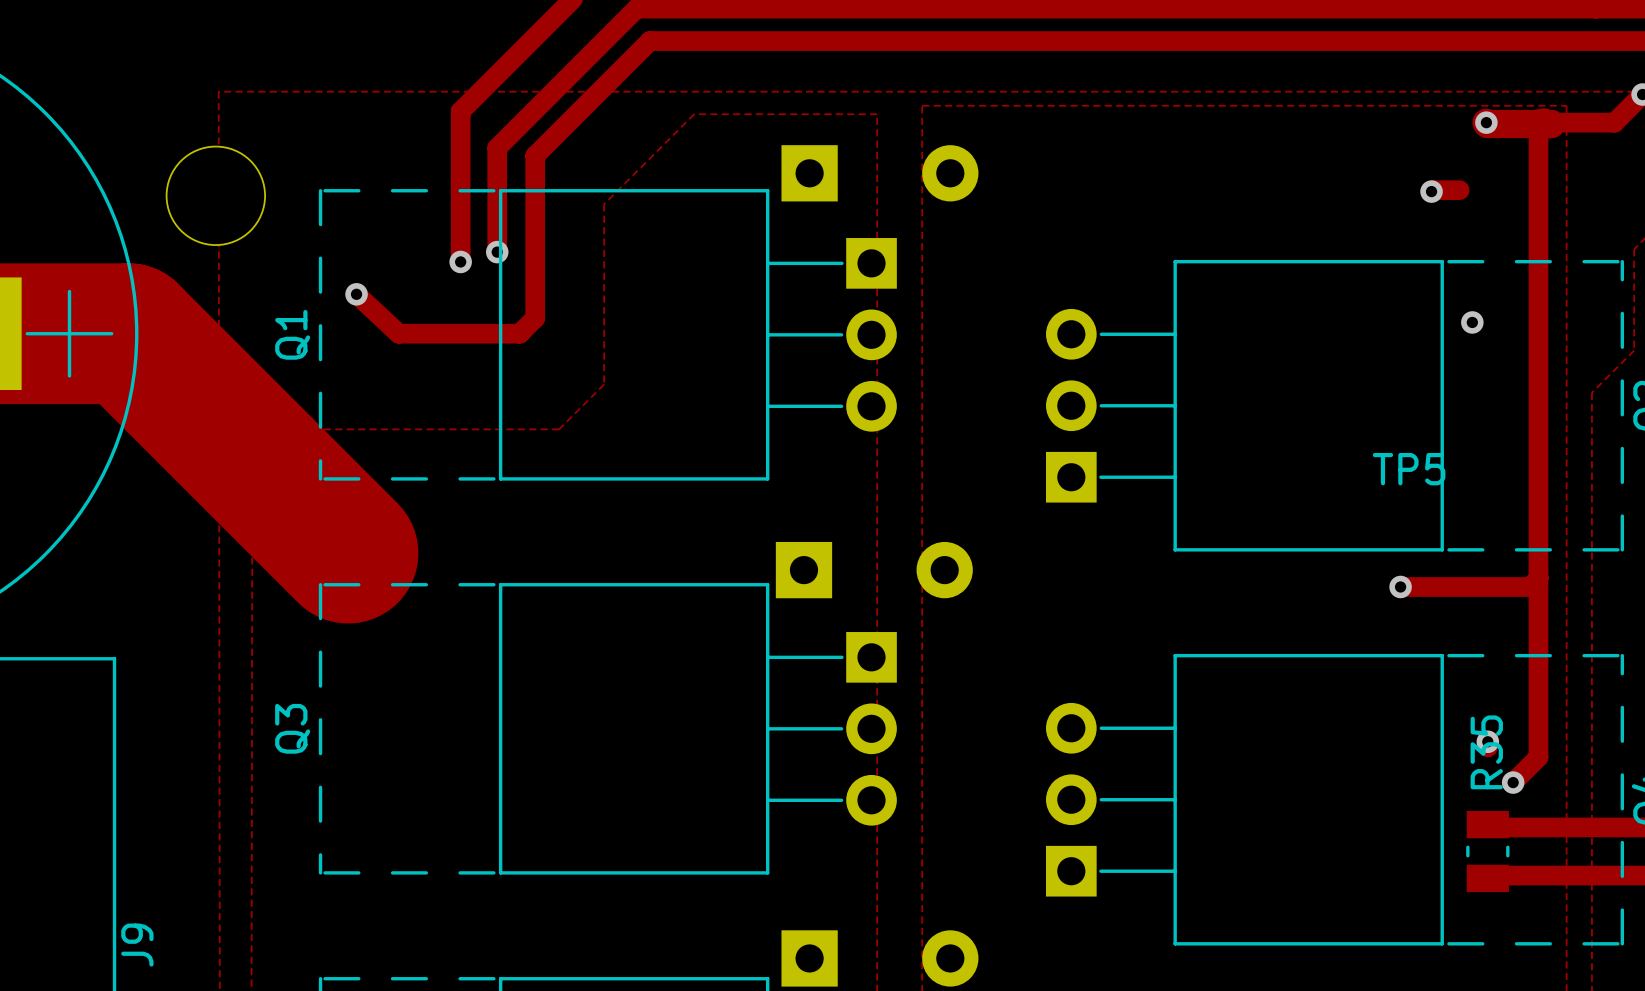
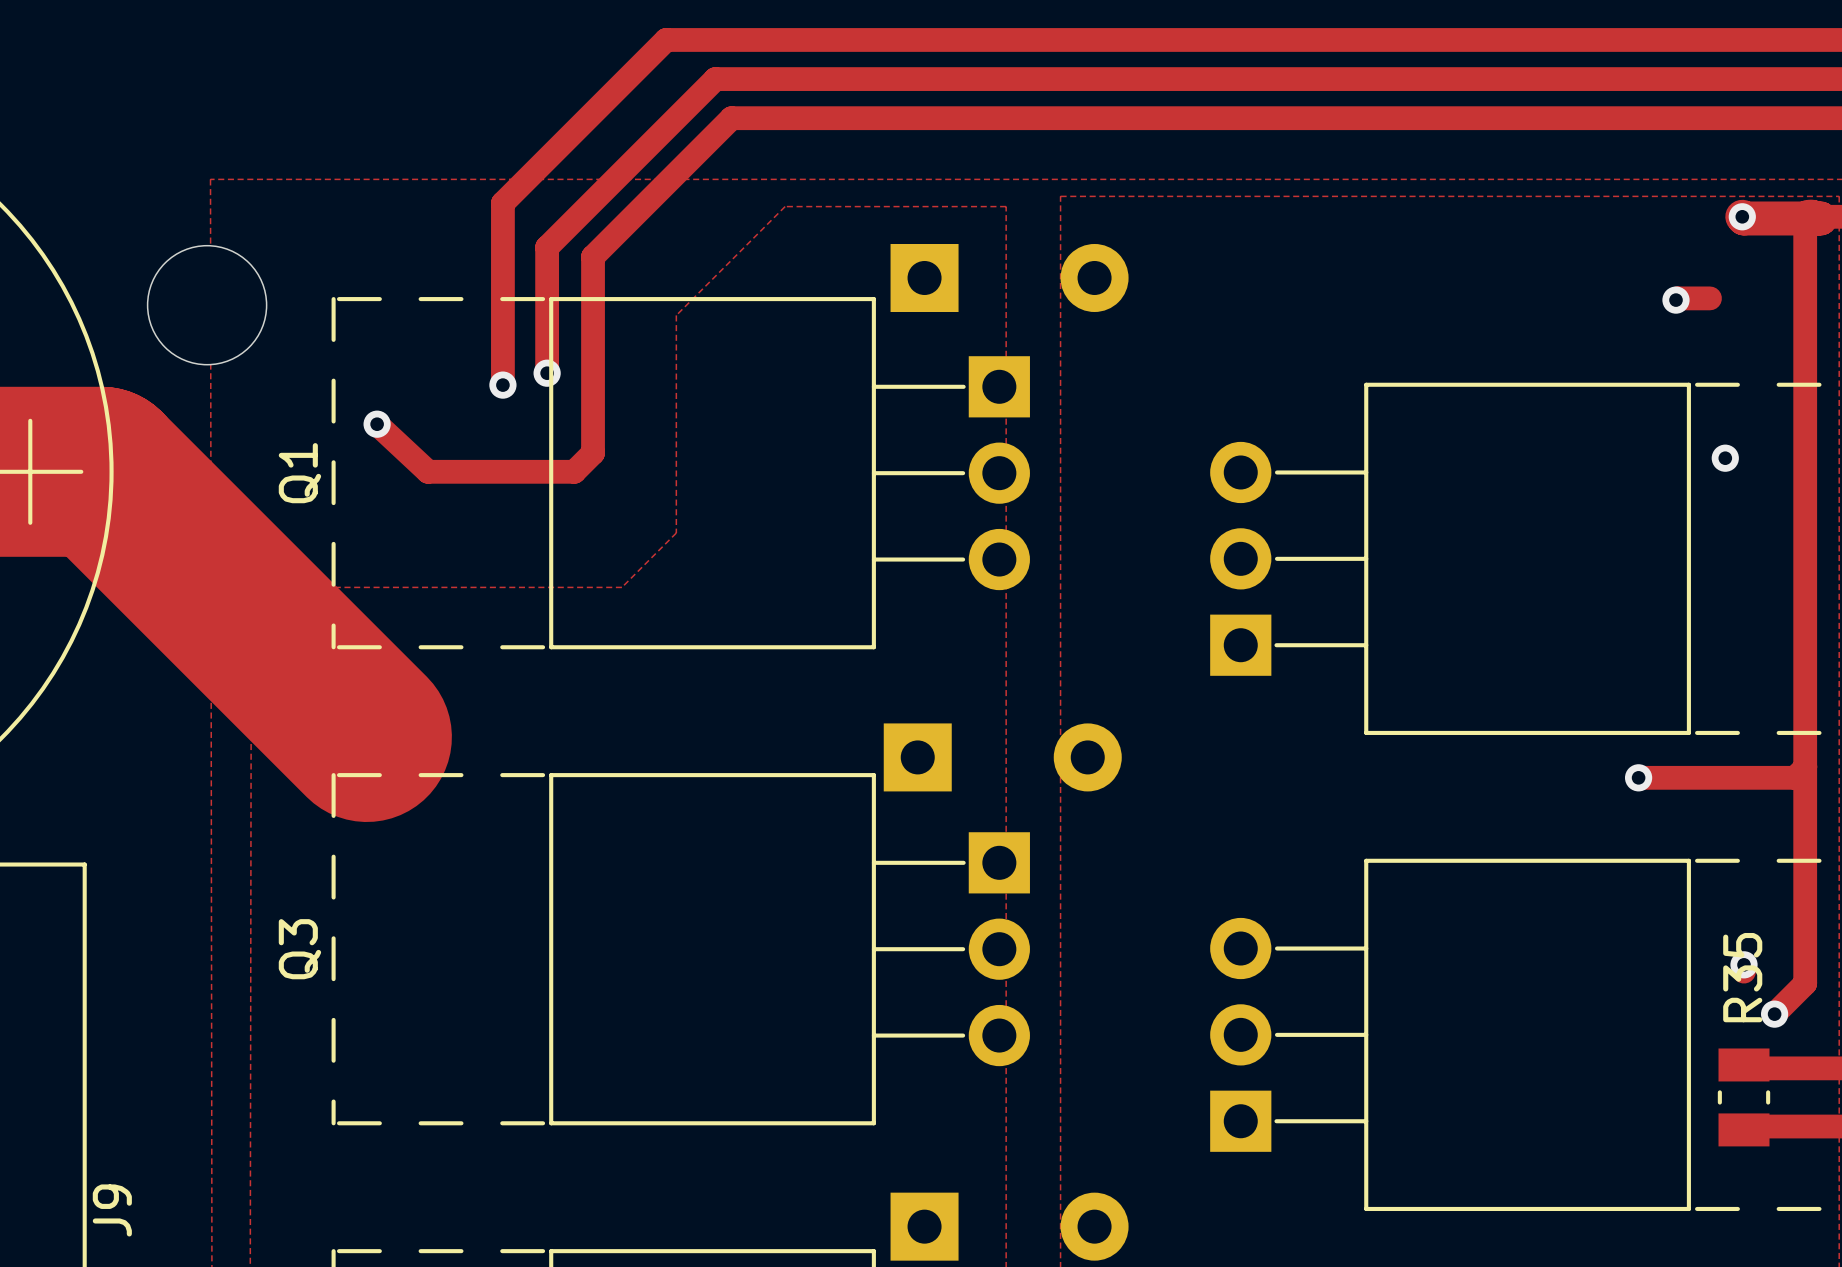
TP5: (1410, 498) -> none

